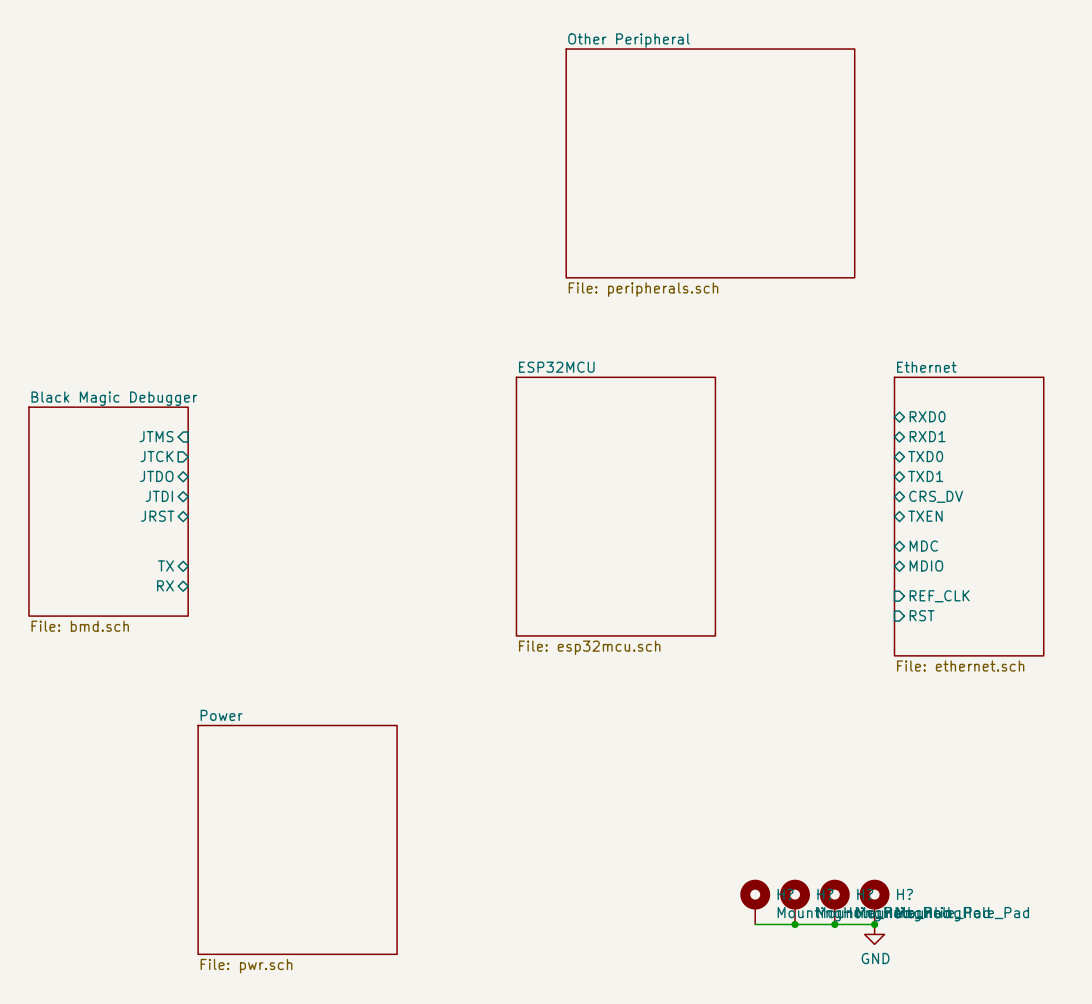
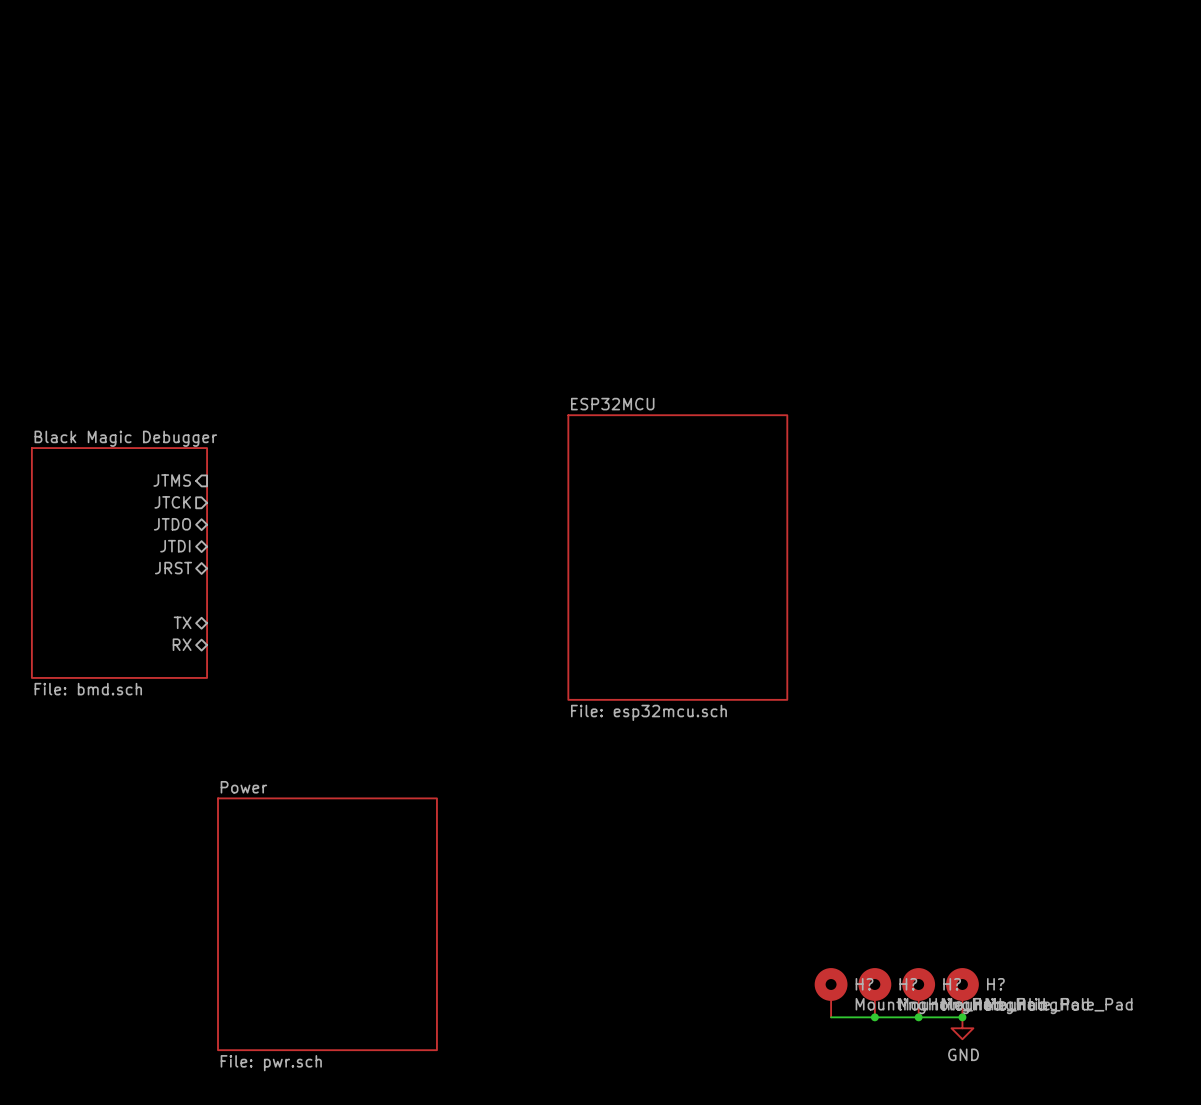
sheet Other Peripheral: File: peripherals.sch (710, 163) -> none
sheet pin: RXD0 (927, 416) -> none
sheet pin: RXD1 (927, 436) -> none
sheet pin: TXD0 (925, 456) -> none
sheet pin: TXD1 (925, 476) -> none
sheet pin: CRS_DV (936, 496) -> none
sheet pin: TXEN (925, 516) -> none
sheet Ethernet: File: ethernet.sch (969, 516) -> none
sheet pin: MDC (923, 546) -> none
sheet pin: MDIO (926, 565) -> none
sheet pin: REF_CLK (939, 596) -> none
sheet pin: RST (922, 615) -> none

